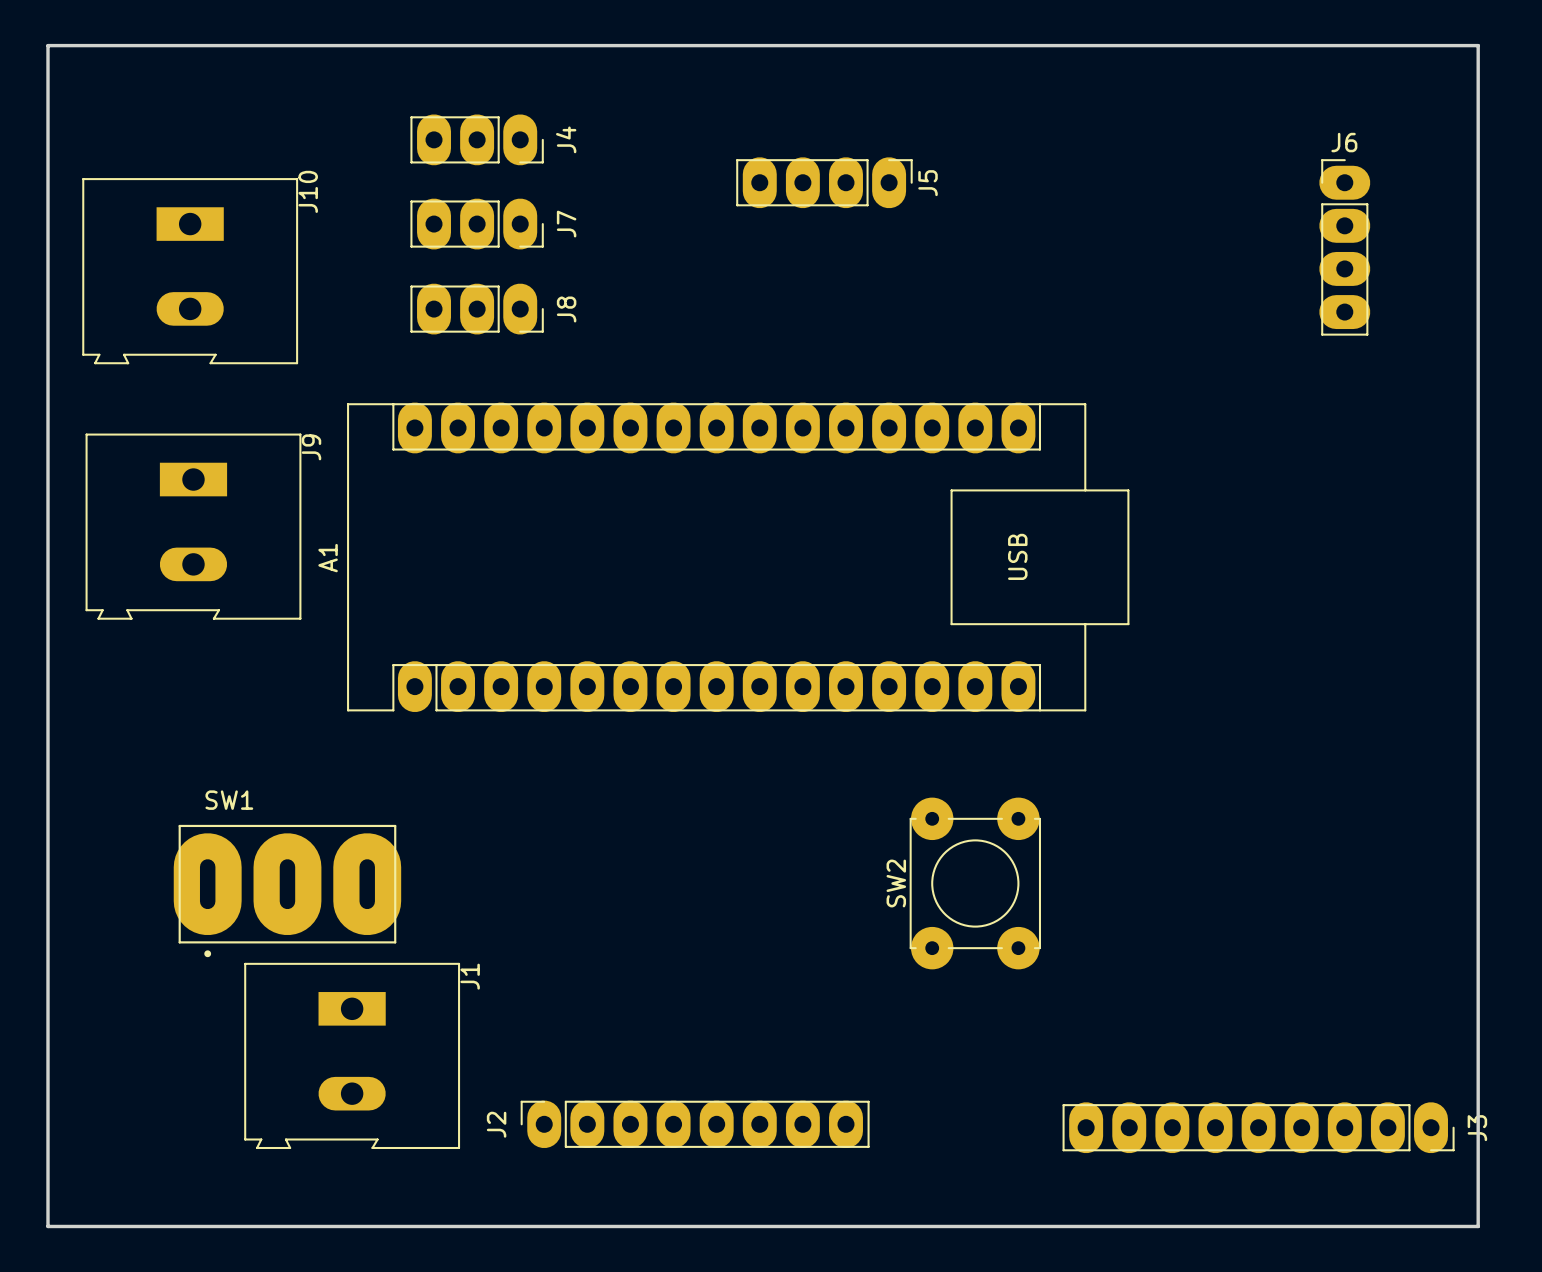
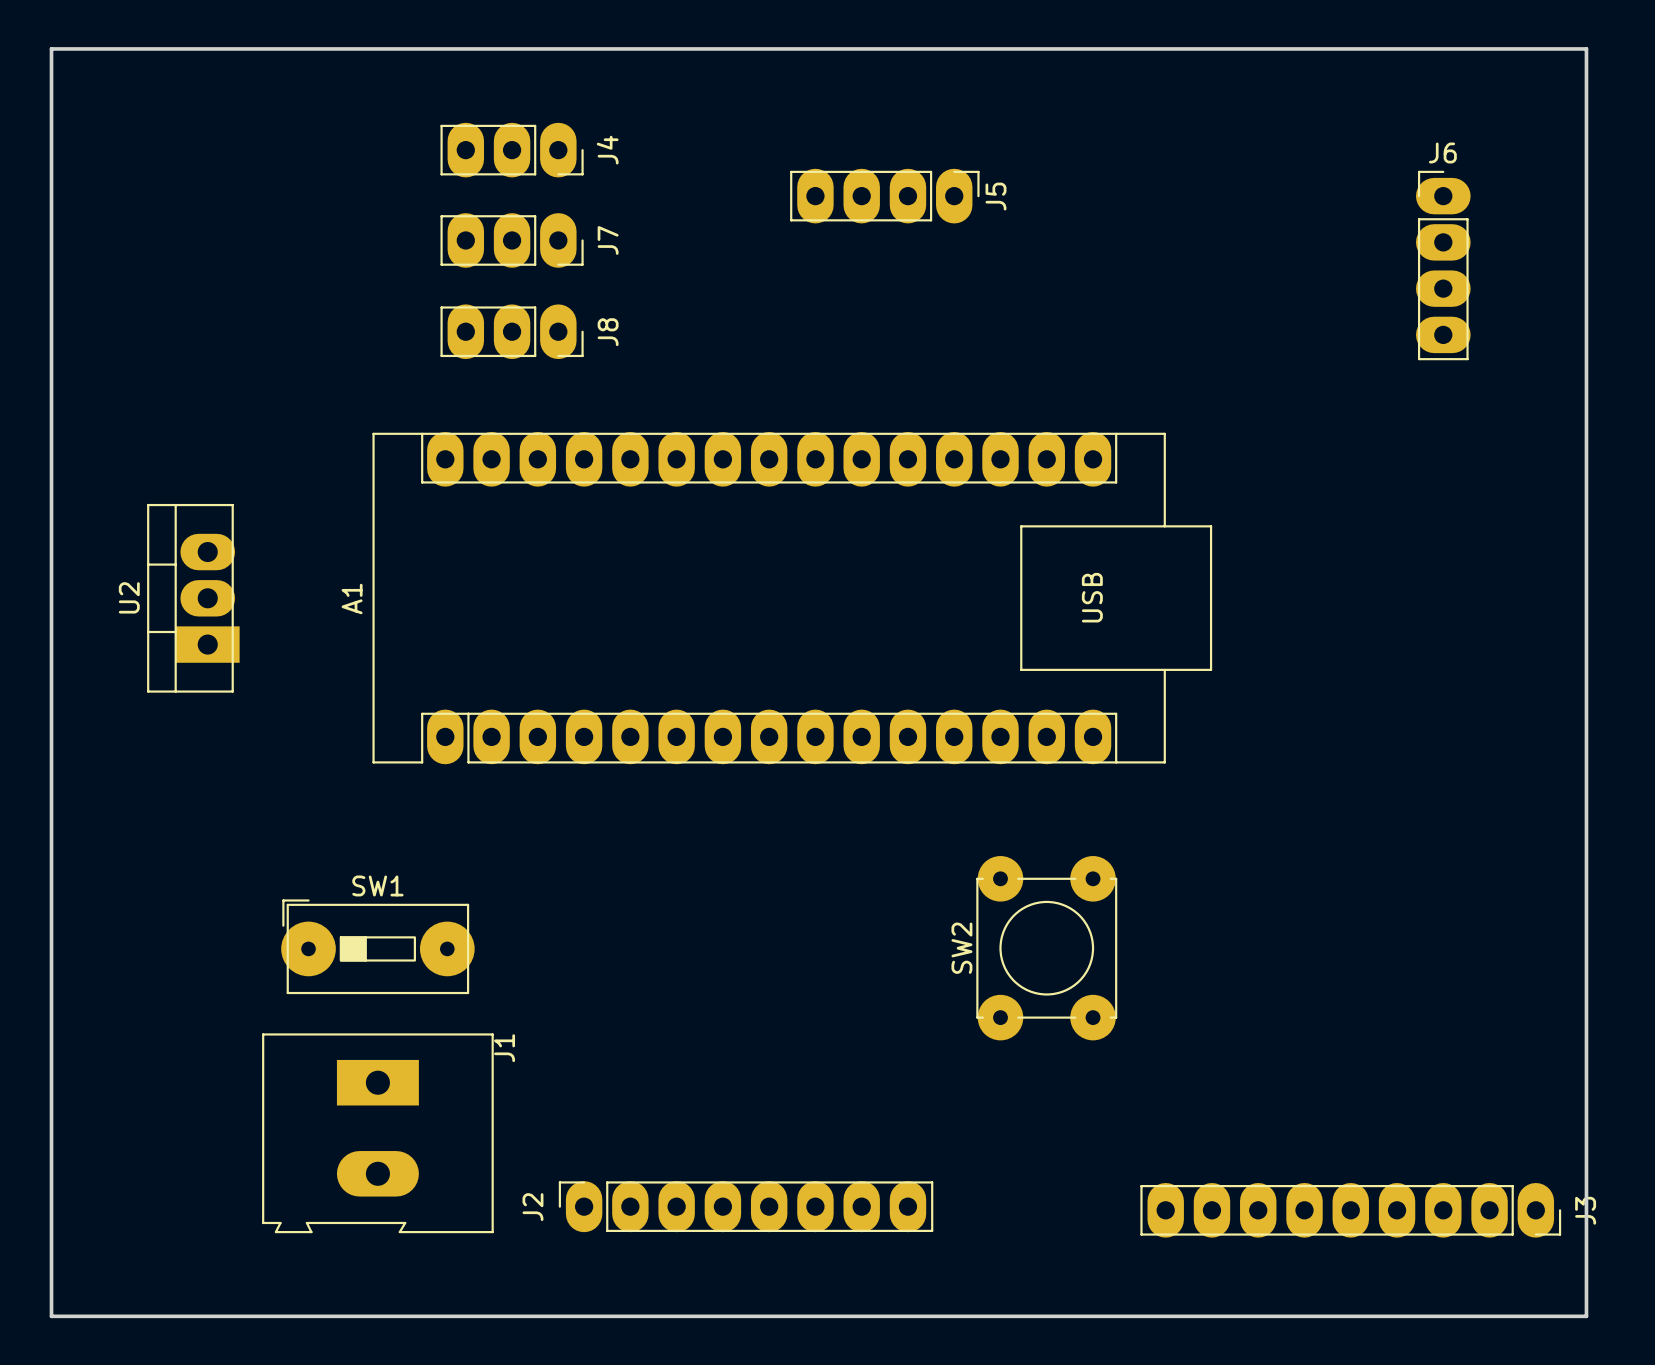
J10: (190, 271) -> none
J9: (193, 526) -> none
U2: none -> (193, 598)
SW1 name position: SW1 (229, 800) -> SW1 (377, 885)
SW1 footprint: [173, 824, 402, 958] -> [281, 899, 475, 995]
J1 footprint: [244, 962, 461, 1150] -> [262, 1033, 494, 1234]

